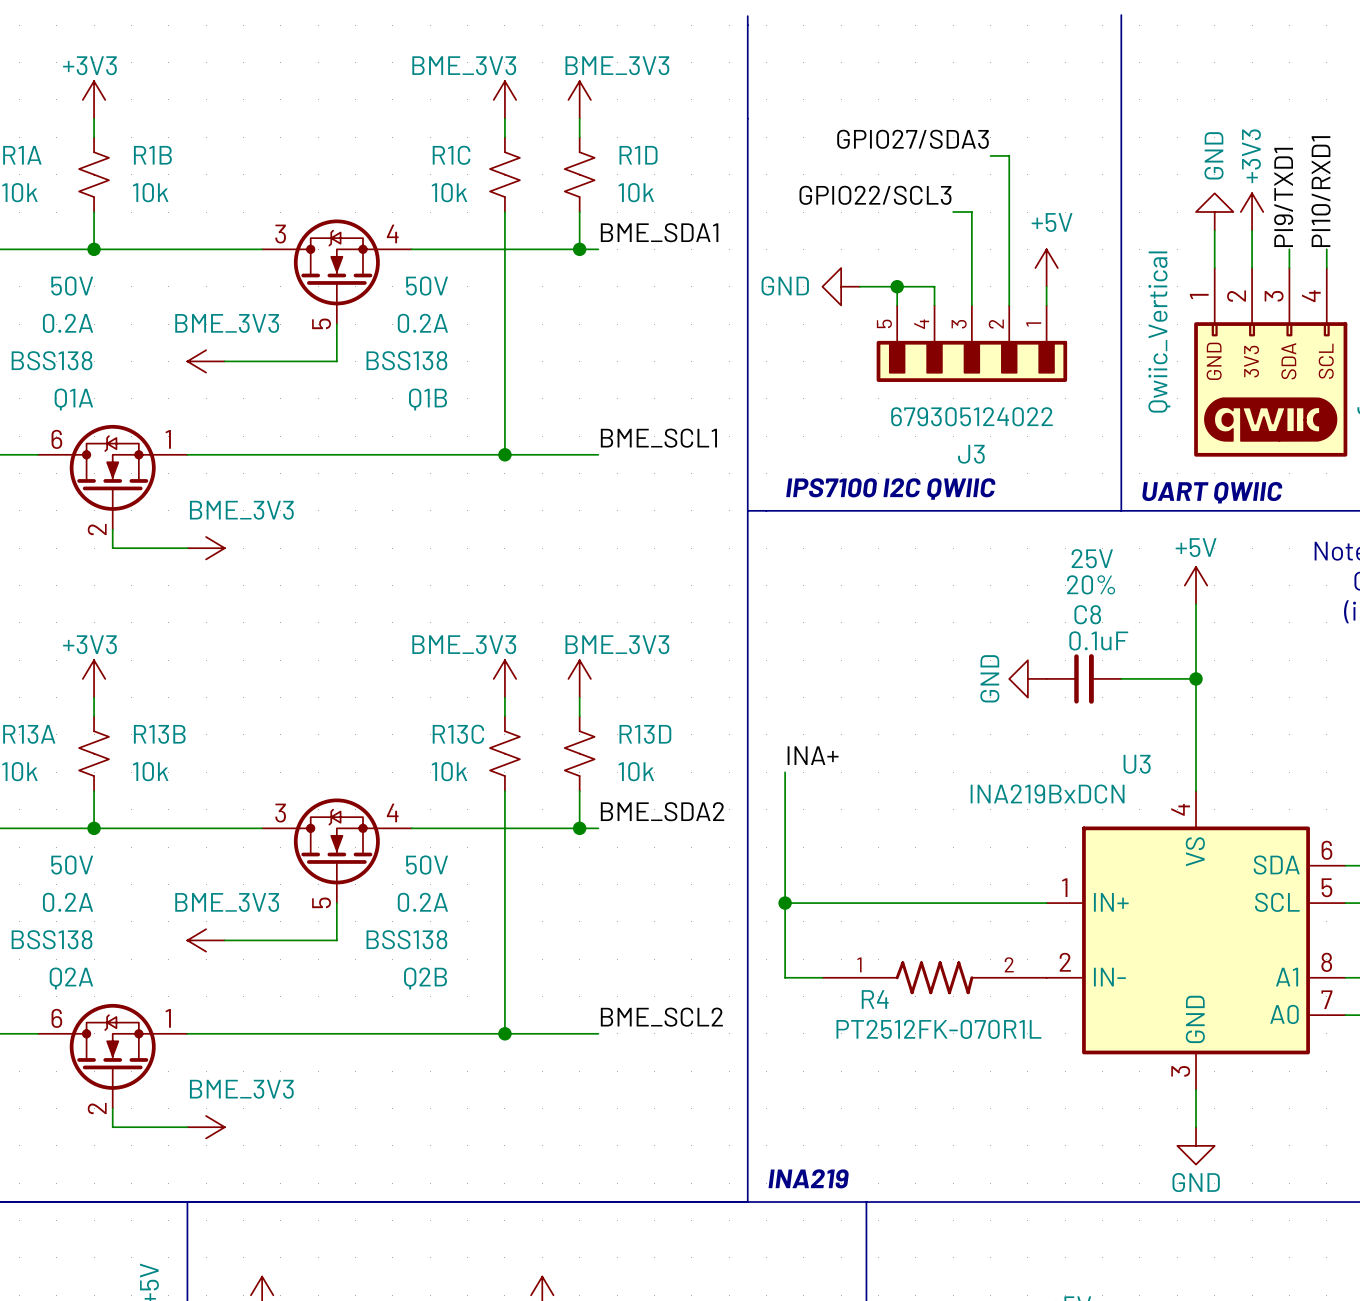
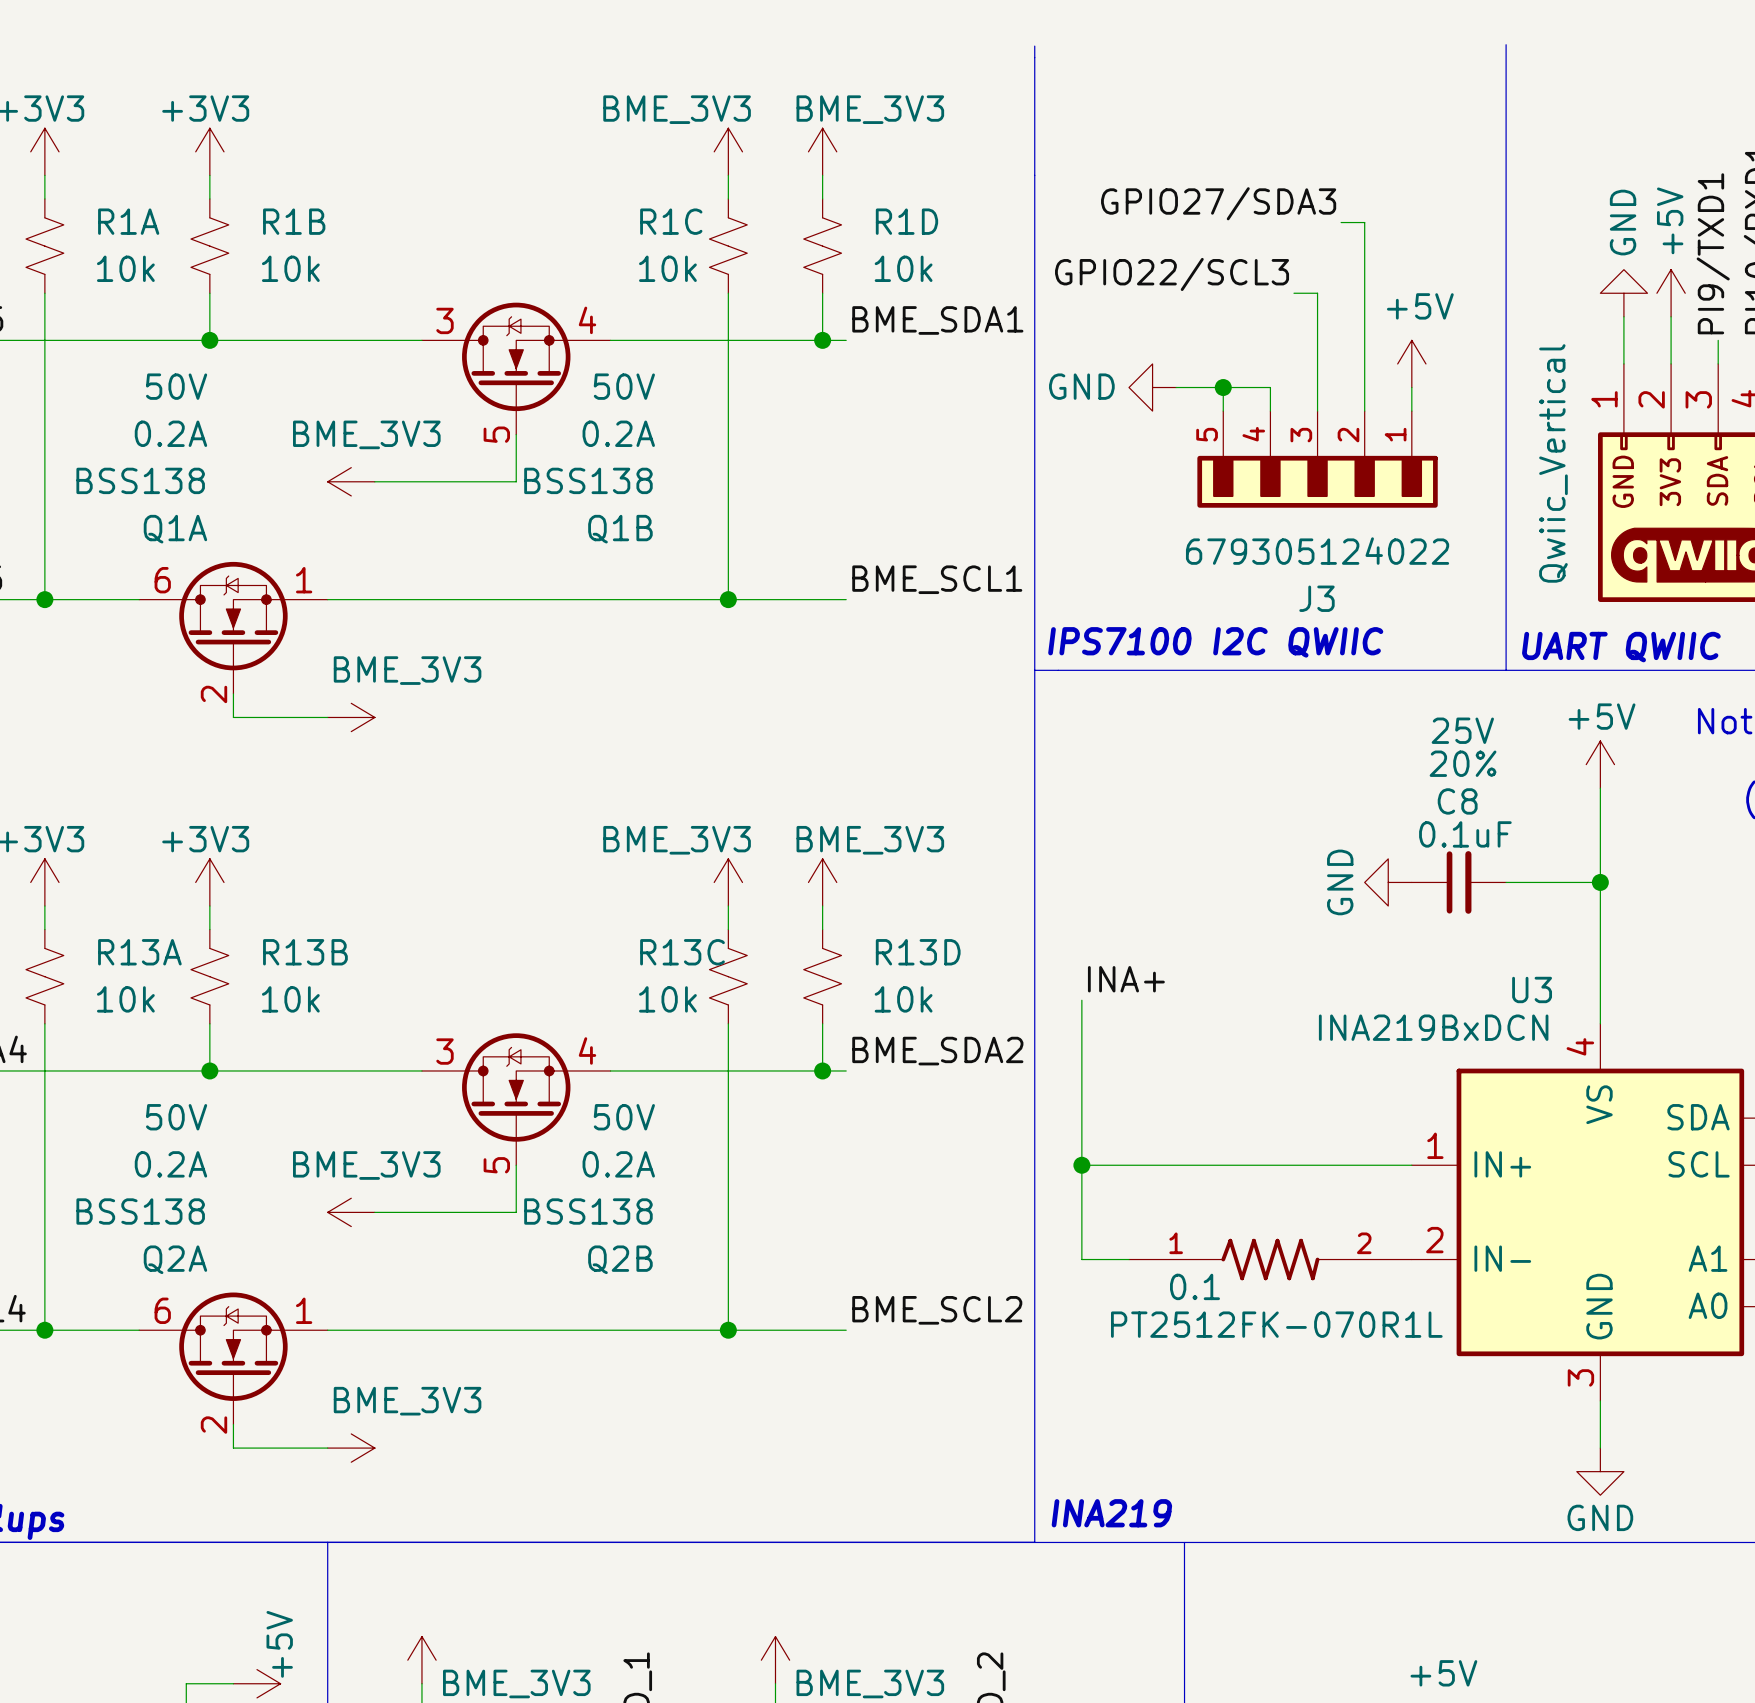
power symbol: +3V3 (1252, 212) -> +5V (1671, 293)
R4 name: R4 (875, 999) -> 0.1 (1195, 1286)

